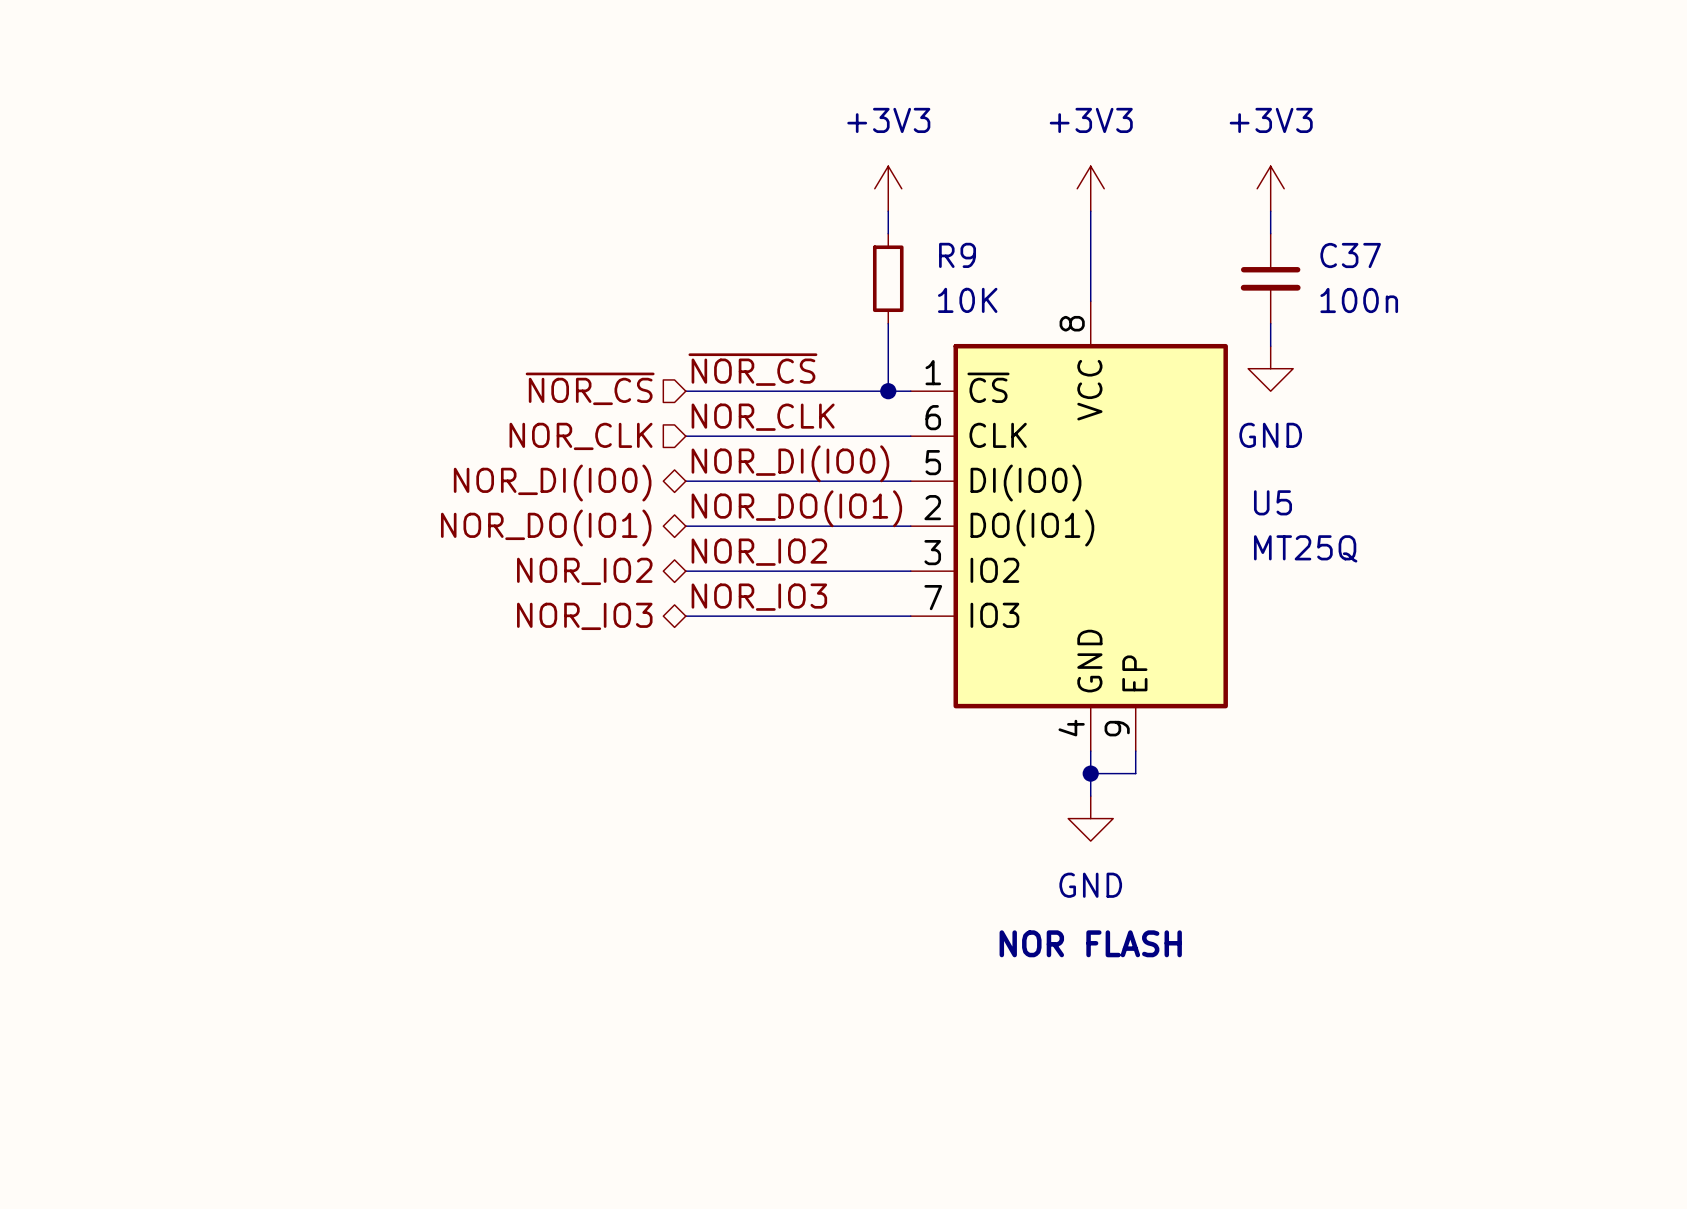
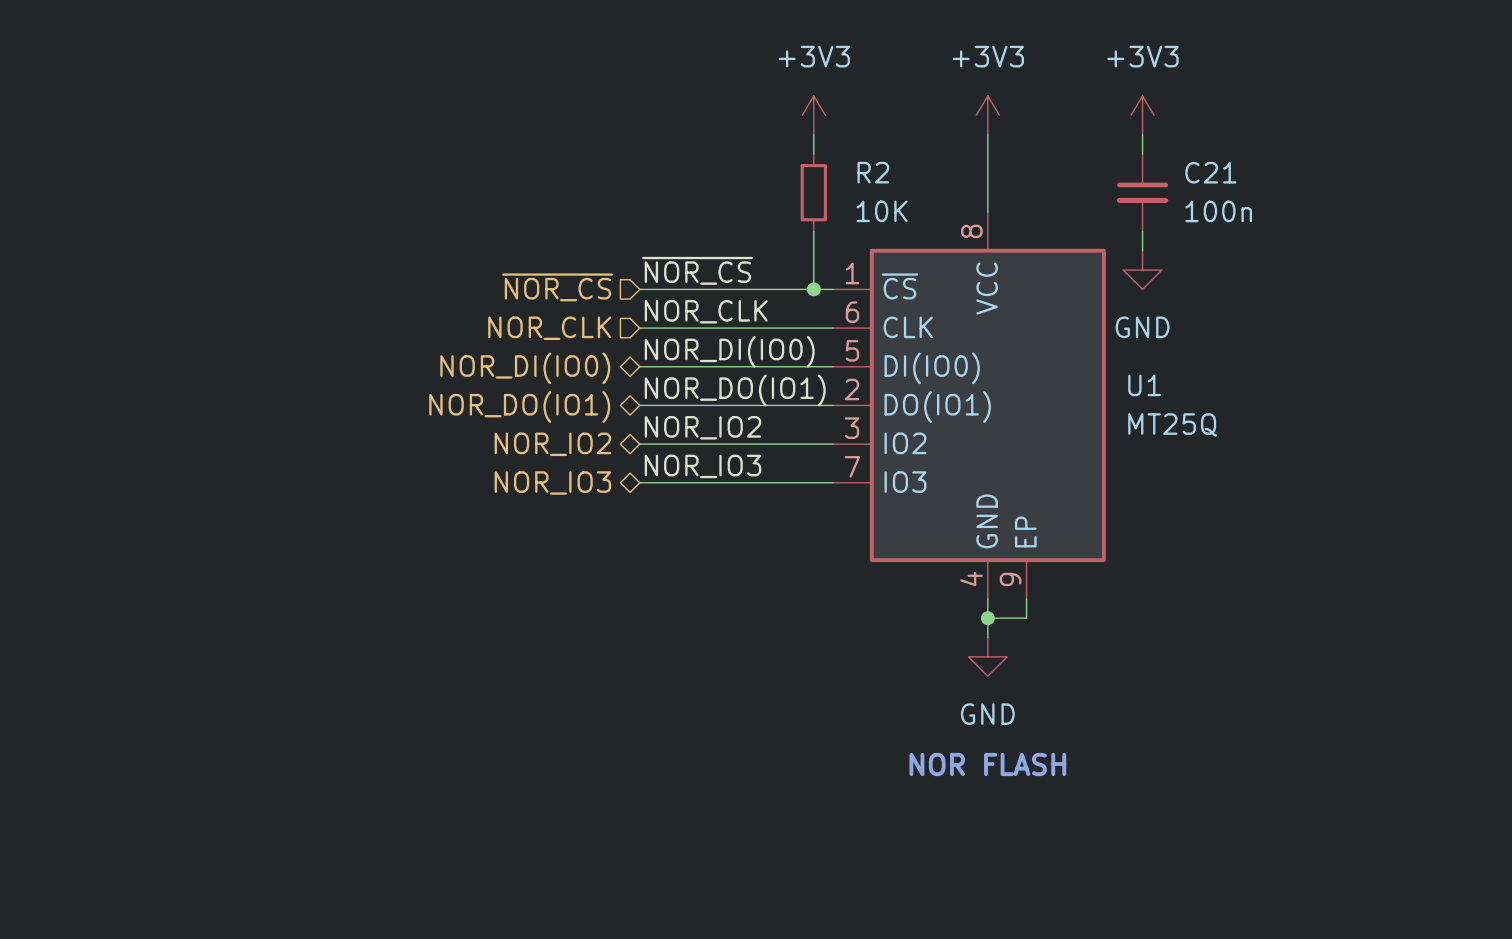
R9 name: R9 (957, 255) -> R2 (873, 172)
C37 name: C37 (1350, 255) -> C21 (1210, 172)
U5 name: U5 (1272, 502) -> U1 (1144, 385)

